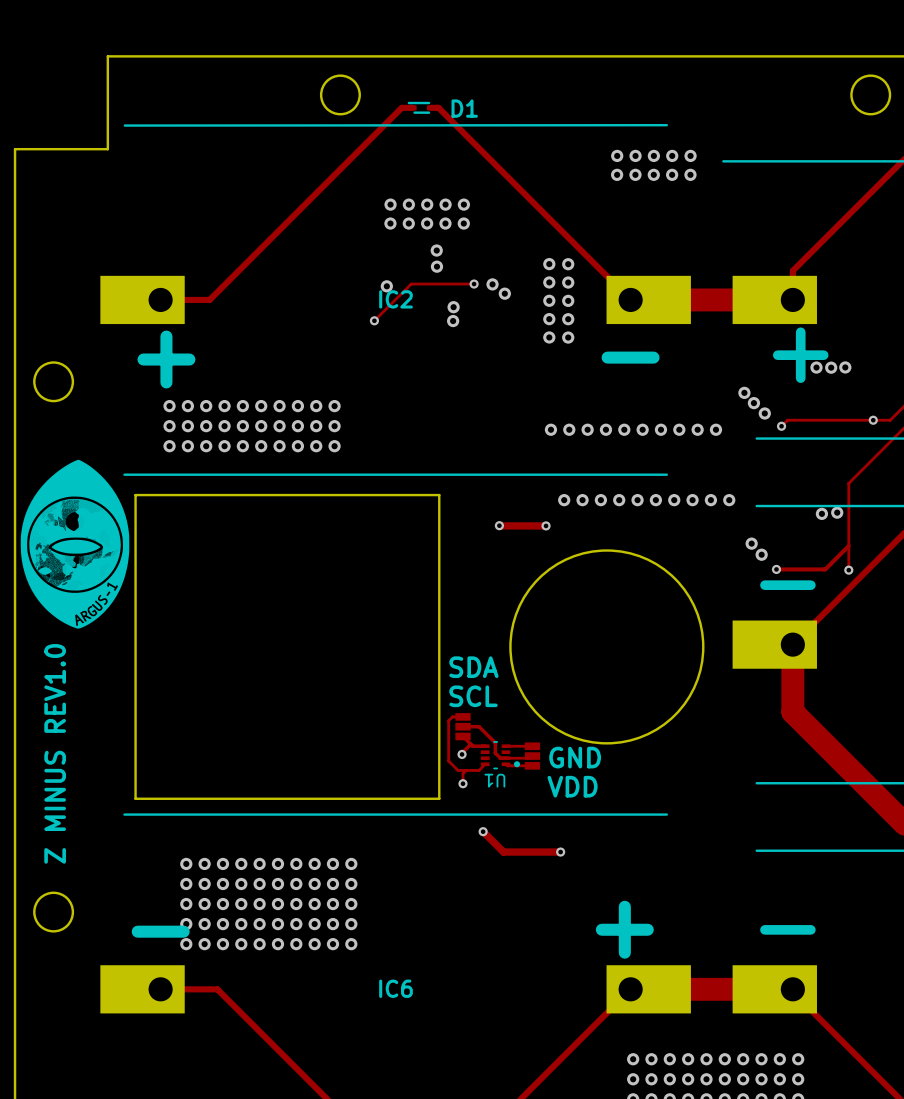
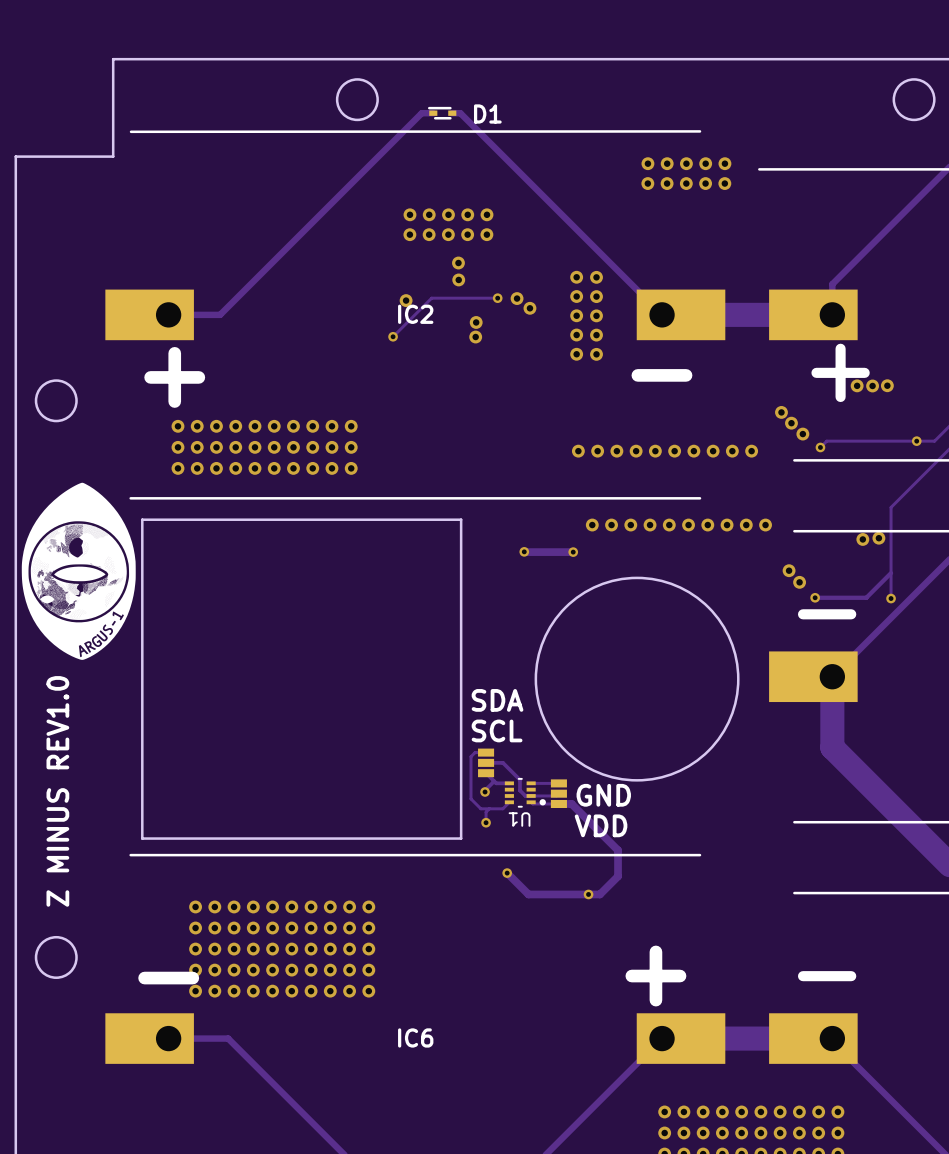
track: none -> (558, 803) (571, 803) (618, 850) (618, 876) (599, 894) (588, 894)

